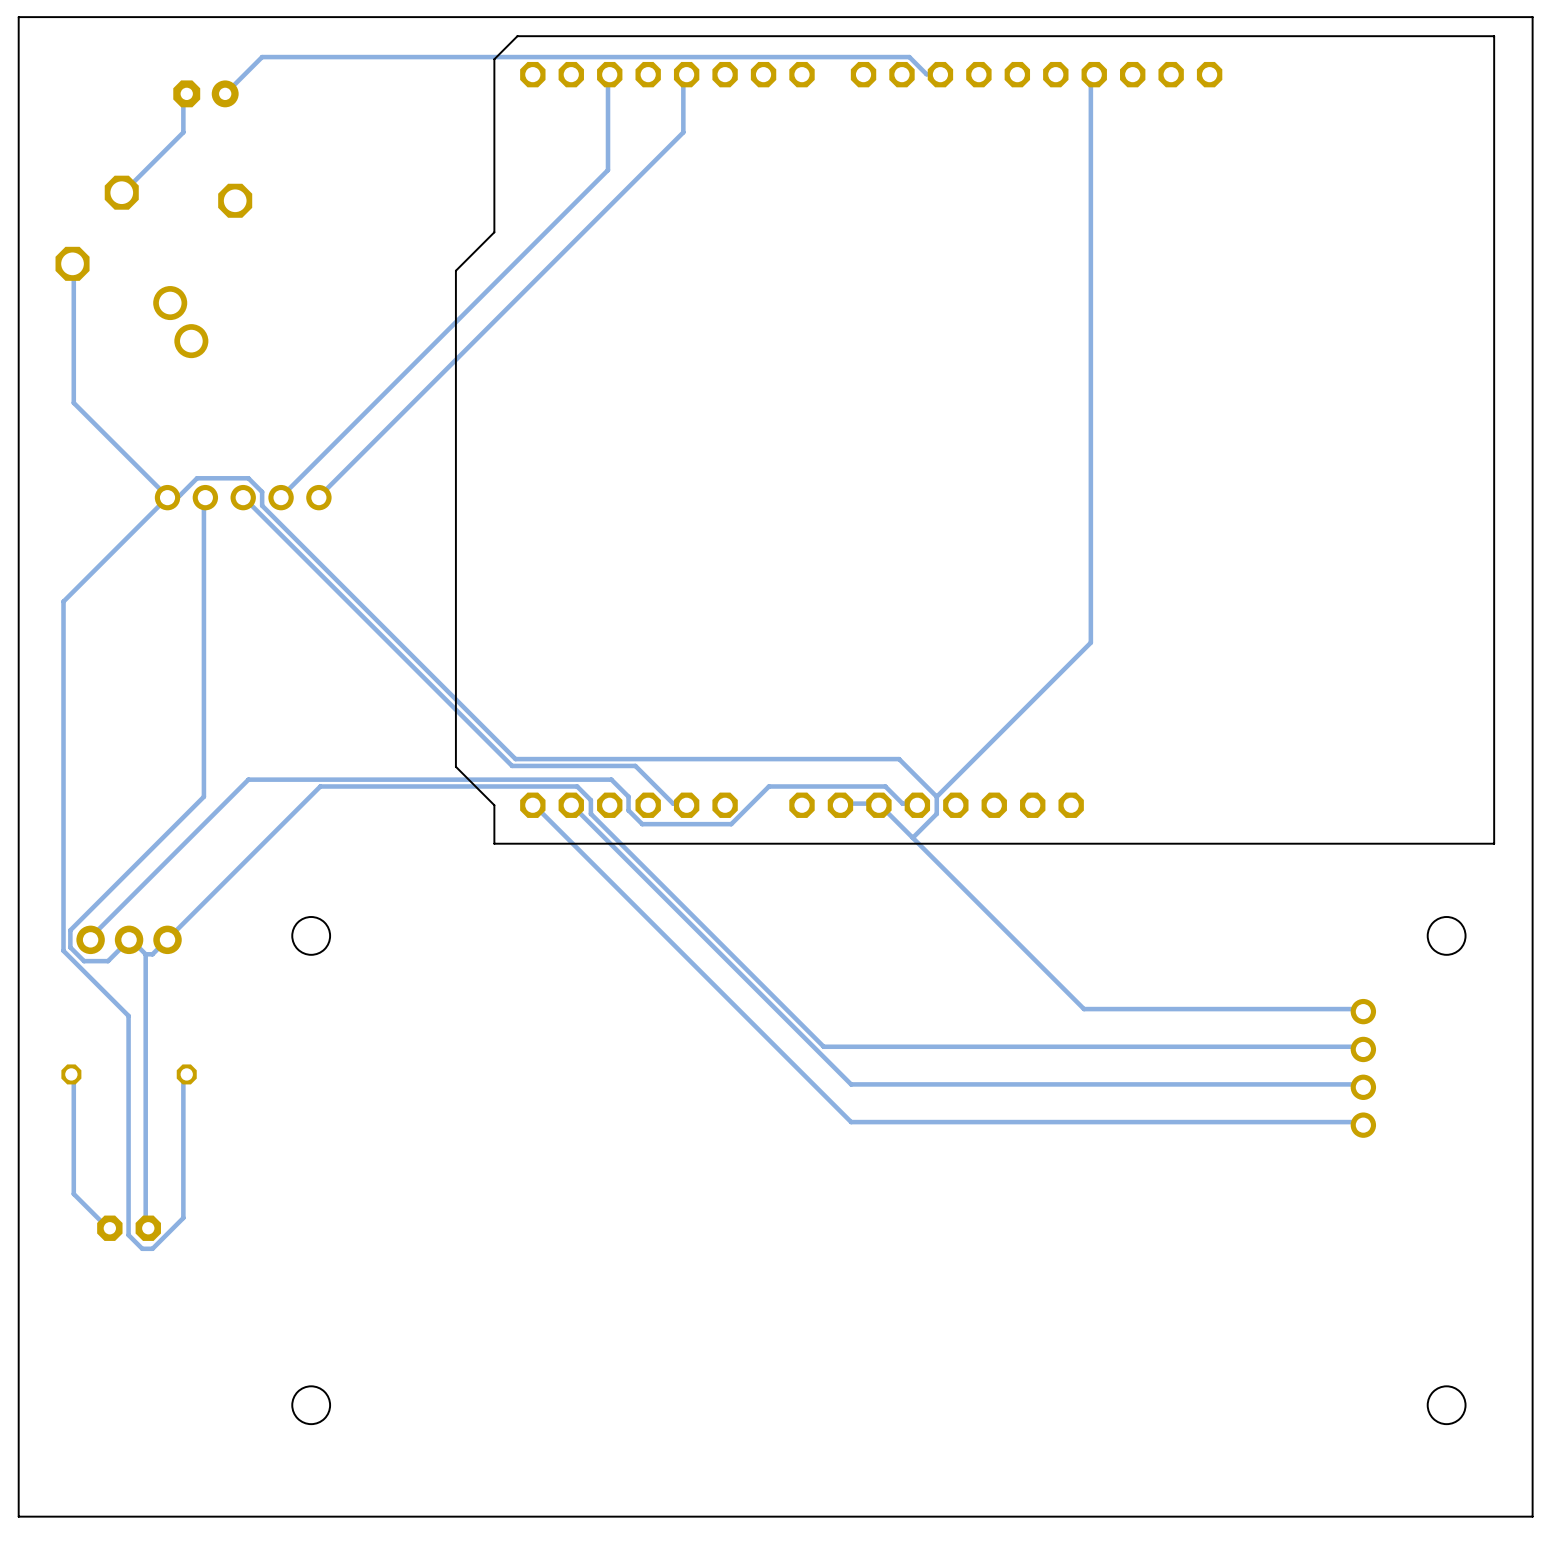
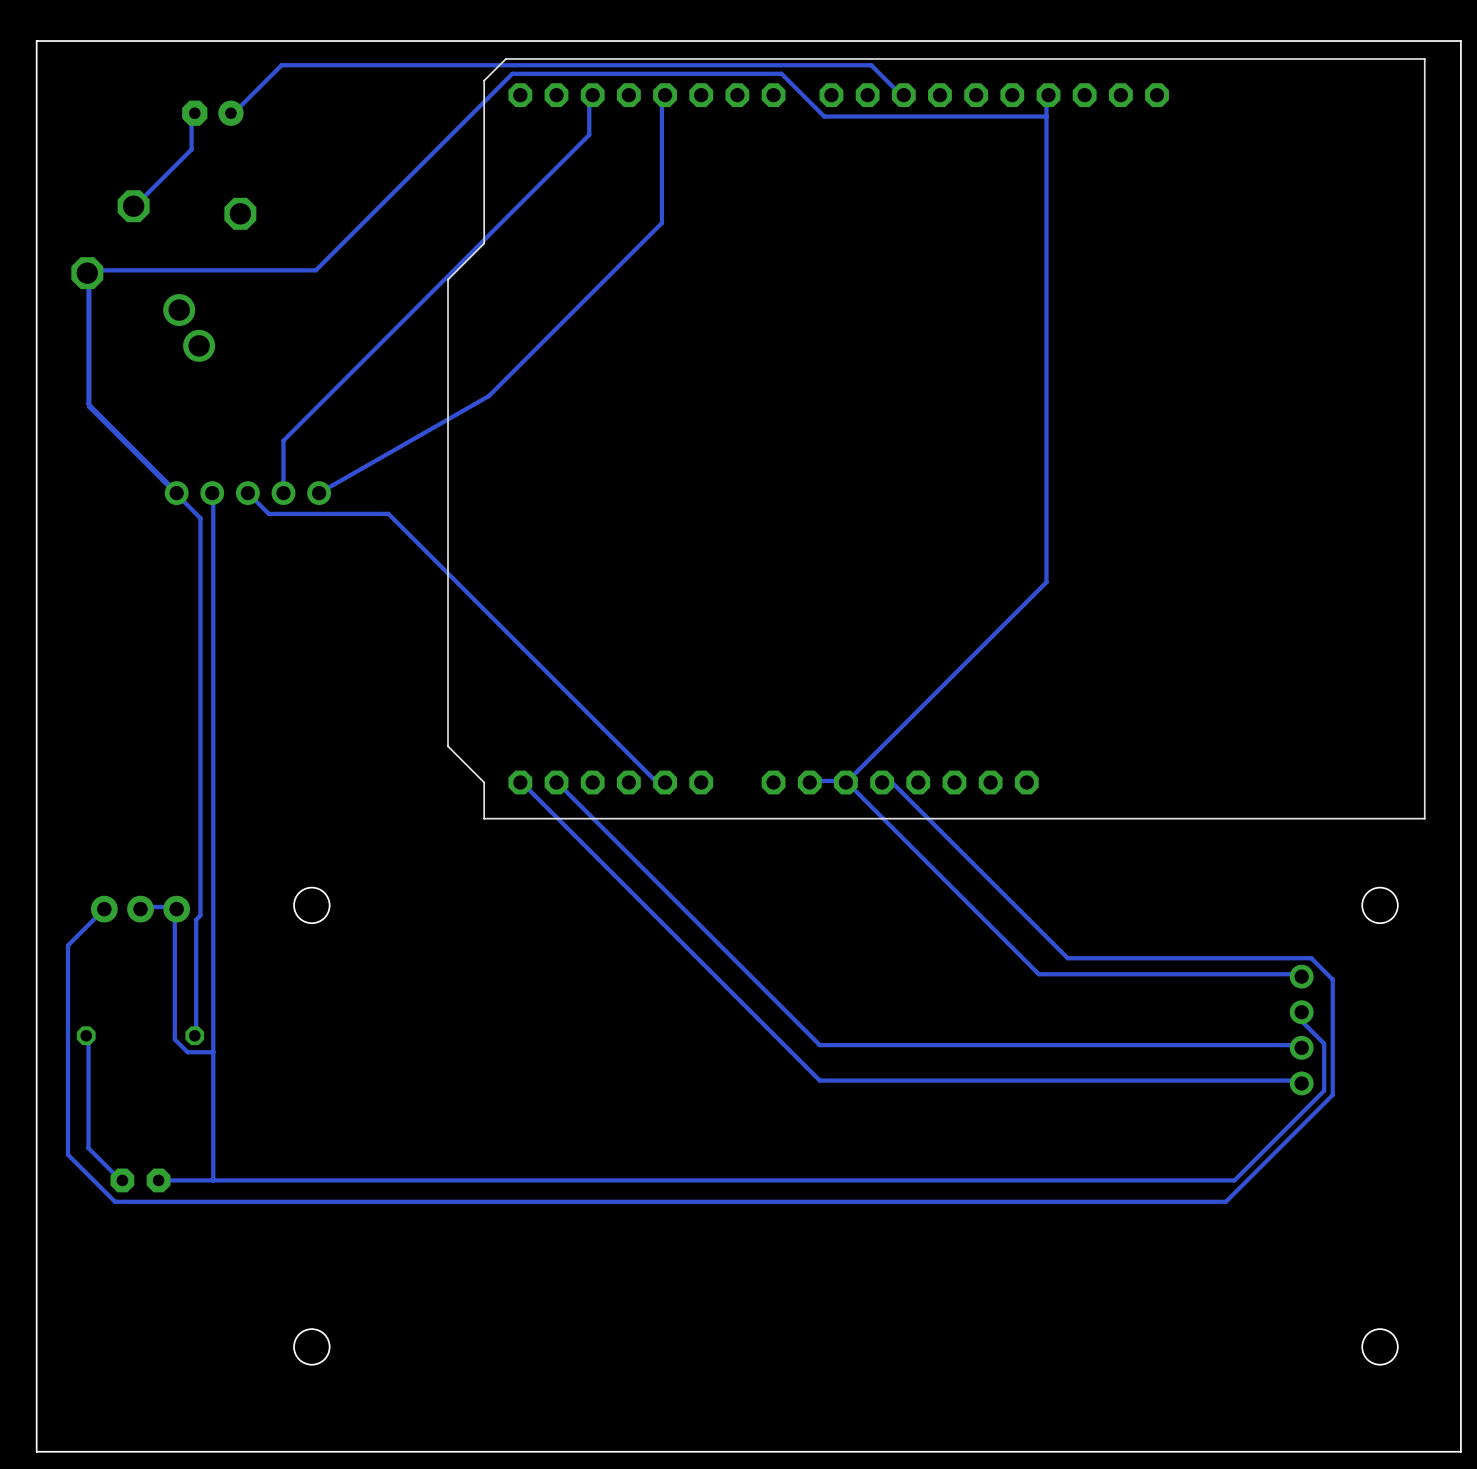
track: (609, 74) (608, 77) (608, 170) (281, 497) -> (592, 95) (589, 95) (589, 134) (283, 440) (283, 493)
track: (940, 74) (926, 74) (909, 57) (262, 57) (225, 93) -> (903, 95) (901, 95) (871, 65) (281, 65) (234, 112) (230, 113)
track: (1094, 74) (1090, 77) (1090, 642) (936, 796) -> (1048, 95) (1046, 95) (1046, 582) (845, 782)
track: (683, 132) (318, 497) -> (661, 149) (661, 223) (488, 396) (319, 493)
track: (205, 497) (203, 796) (70, 930) (70, 947) (84, 961) (108, 961) (129, 939) (145, 954) -> (212, 493) (213, 1180)
track: (243, 497) (512, 765) (635, 765) (673, 803) (686, 805) -> (247, 493) (268, 513) (388, 513) (653, 778) (661, 778) (665, 782)
track: (936, 796) (899, 759) (515, 759) (262, 505) (262, 491) (248, 478) (197, 478) (179, 495) (169, 495) (63, 601) (63, 950) (128, 1015) (128, 1235) (142, 1248) (152, 1248) (183, 1217) (183, 1077) (186, 1074) -> (1046, 116) (824, 116) (781, 73) (512, 73) (315, 270) (89, 270) (87, 273) (89, 274) (89, 407) (200, 518) (200, 915) (196, 919) (194, 1035)
track: (936, 796) (936, 813) (912, 837) -> none
track: (917, 805) (916, 803) (902, 803) (885, 786) (768, 786) (731, 824) (642, 824) (628, 810) (628, 796) (611, 779) (248, 779) (90, 937) (90, 939) -> (882, 782) (892, 783) (1067, 958) (1311, 958) (1332, 979) (1332, 1094) (1225, 1201) (115, 1201) (68, 1154) (68, 945) (104, 909)
track: none -> (140, 909) (140, 906) (174, 906) (176, 909) (174, 911) (174, 1039) (187, 1052) (213, 1052)
track: (145, 954) (152, 954) (320, 786) (577, 786) (590, 800) (590, 813) (823, 1046) (1361, 1046) (1363, 1049) -> (158, 1180) (1234, 1180) (1324, 1090) (1324, 1043) (1302, 1022) (1301, 1012)
track: (145, 954) (145, 1228) (148, 1228) -> none

